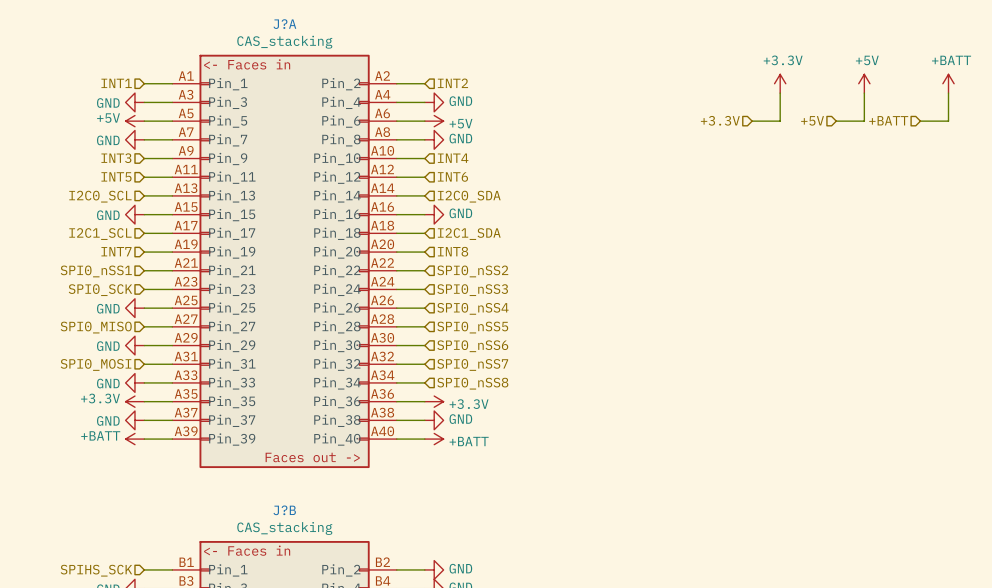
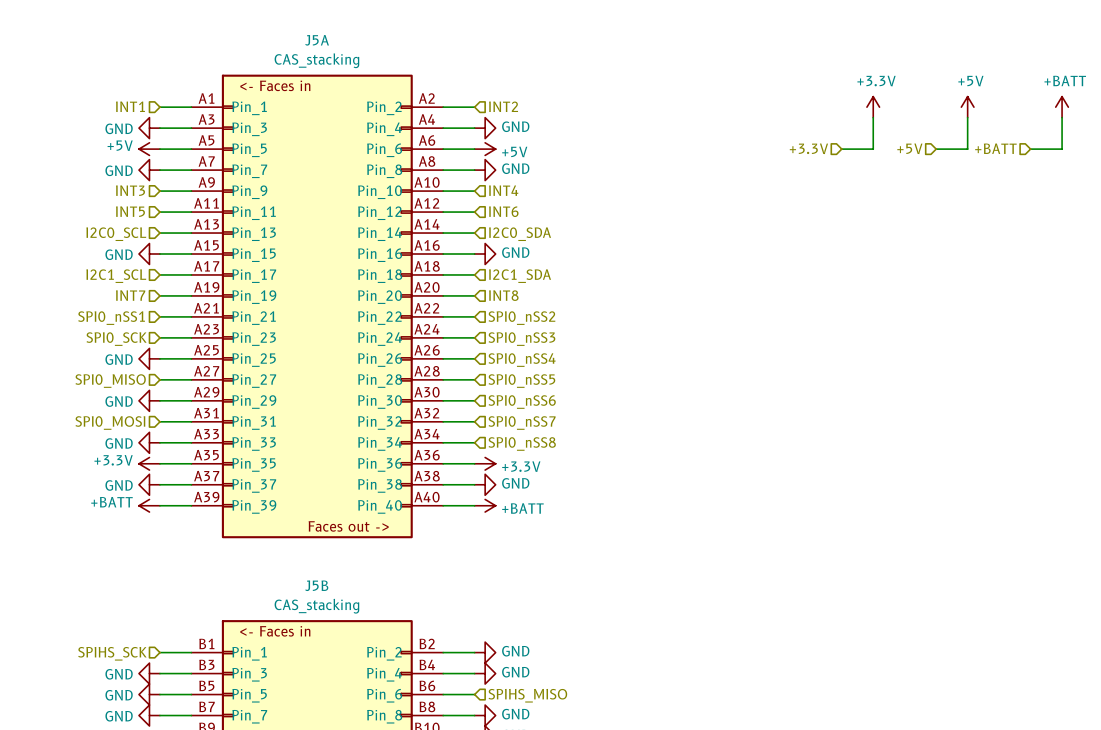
J?A name: J?A (284, 24) -> J5A (317, 40)
J?B name: J?B (284, 510) -> J5B (316, 585)

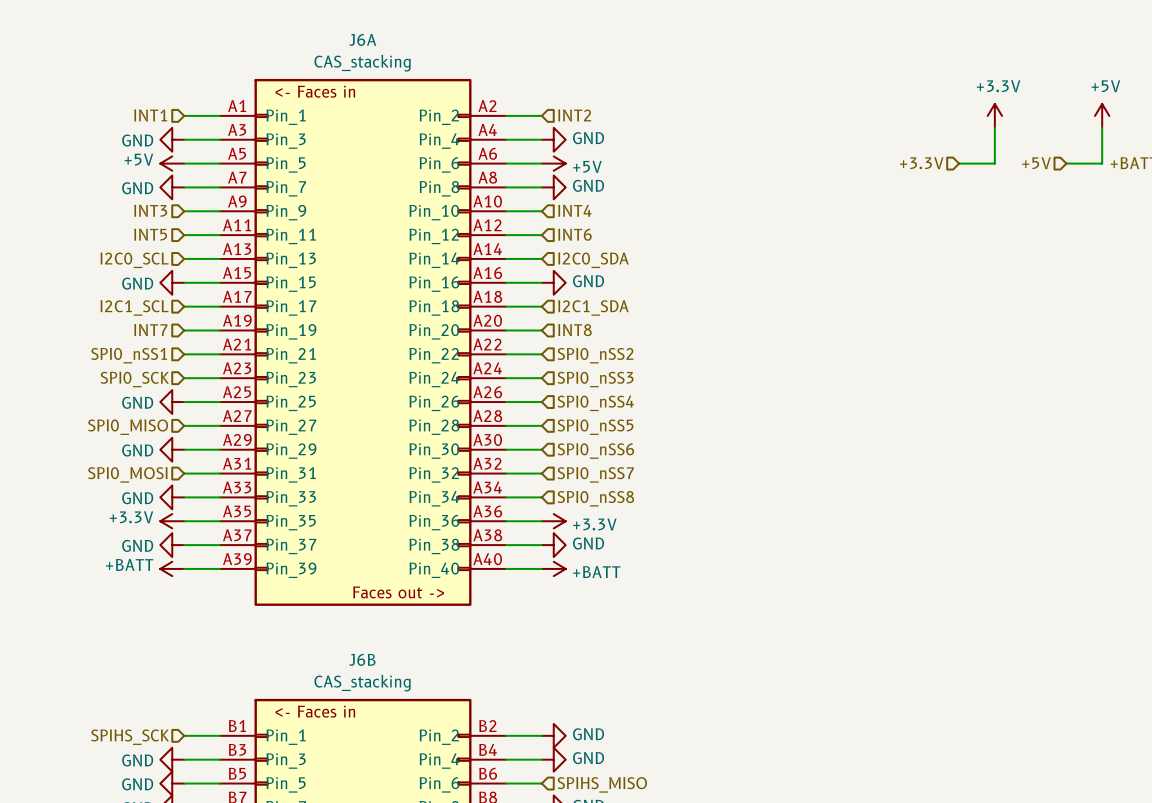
J5A name: J5A (317, 40) -> J6A (362, 39)
J5B name: J5B (316, 585) -> J6B (362, 659)

